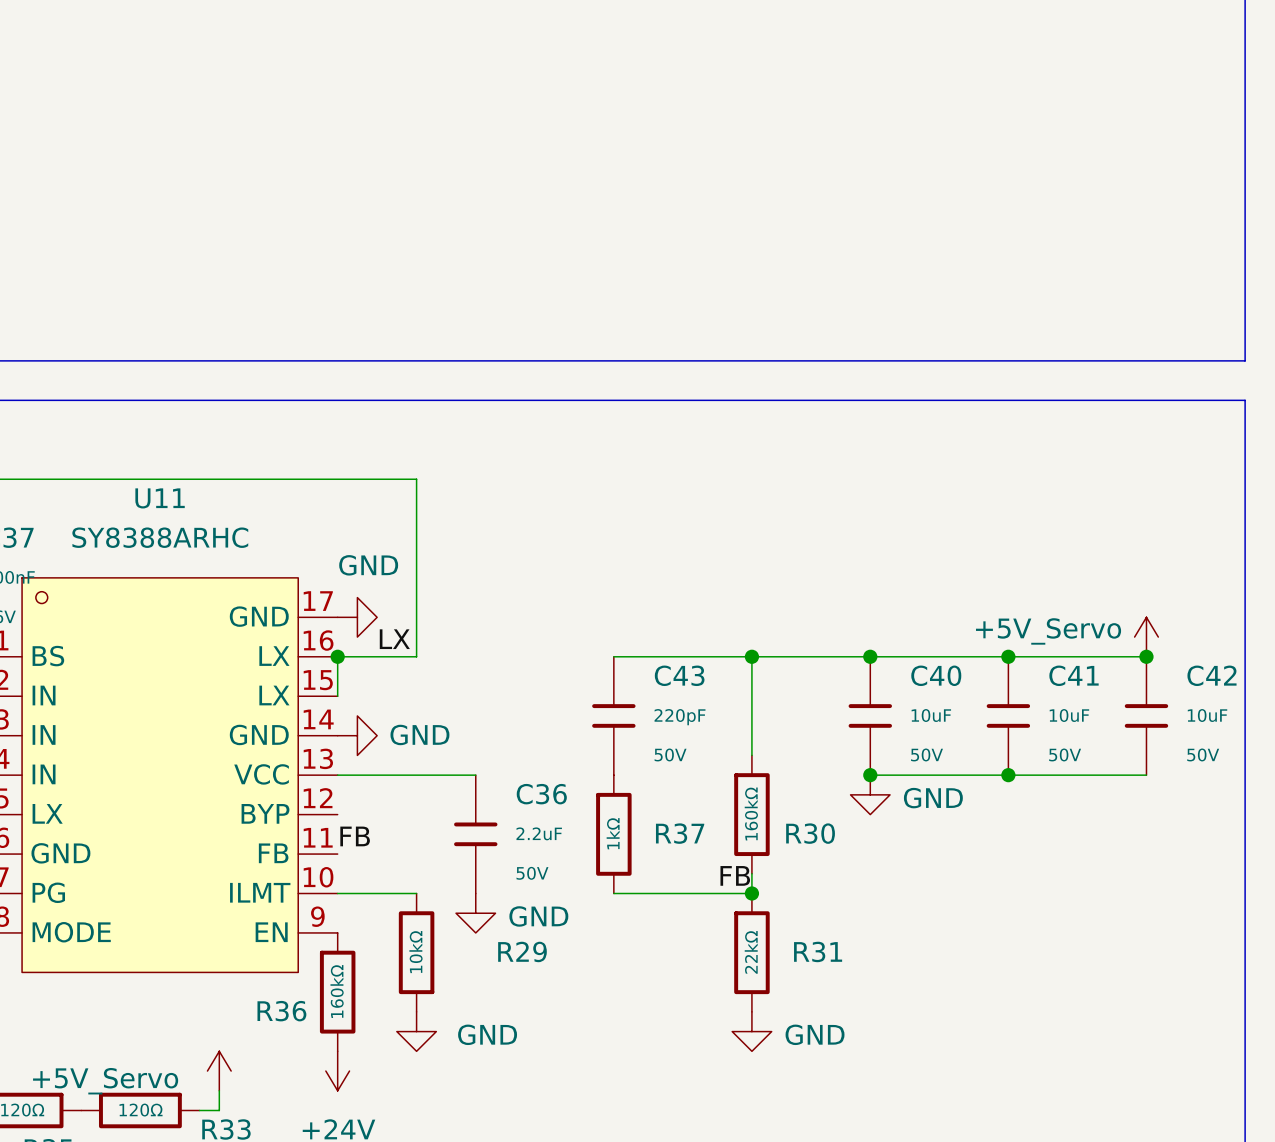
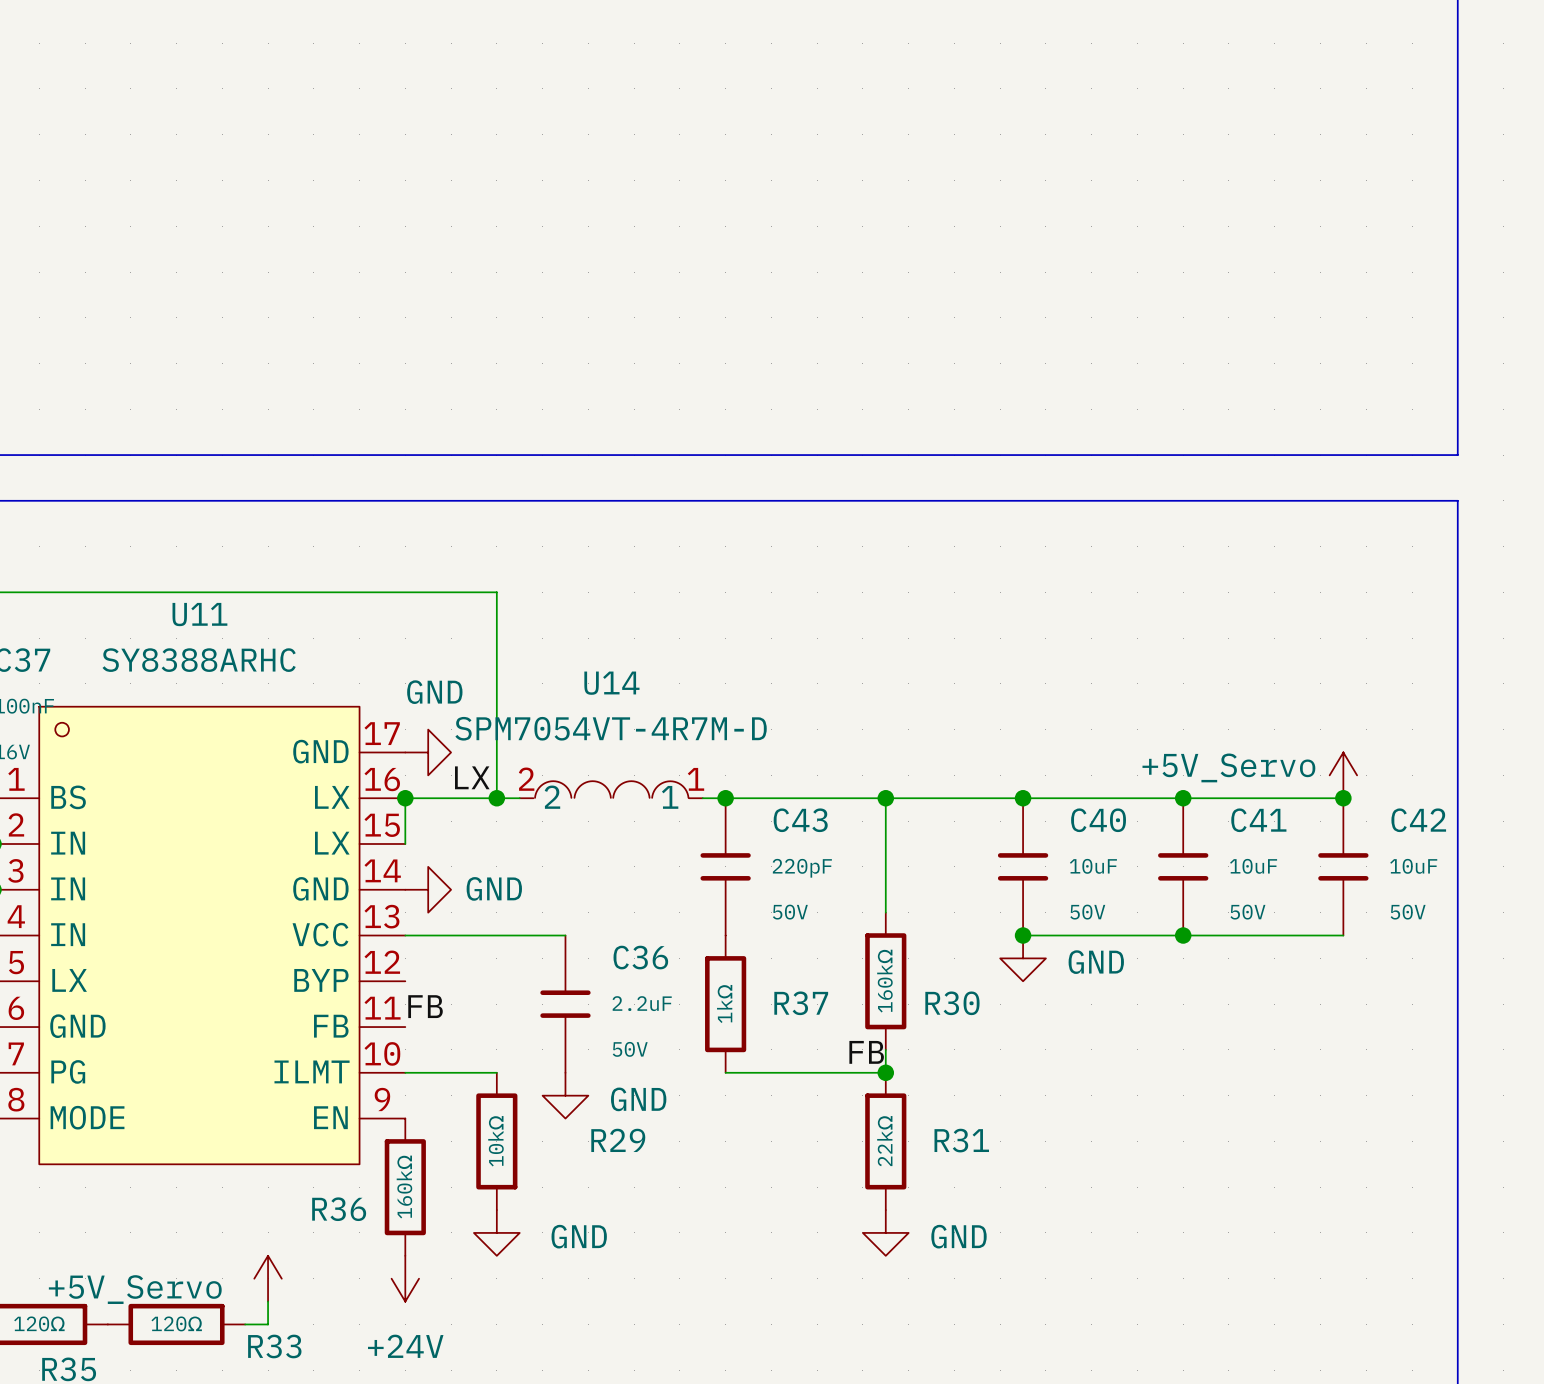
U14: none -> SPM7054VT-4R7M-D (611, 789)
wire: none -> (496, 798) (519, 798)
junction: none -> (496, 798)
wire: none -> (702, 798) (725, 798)
junction: none -> (725, 798)

